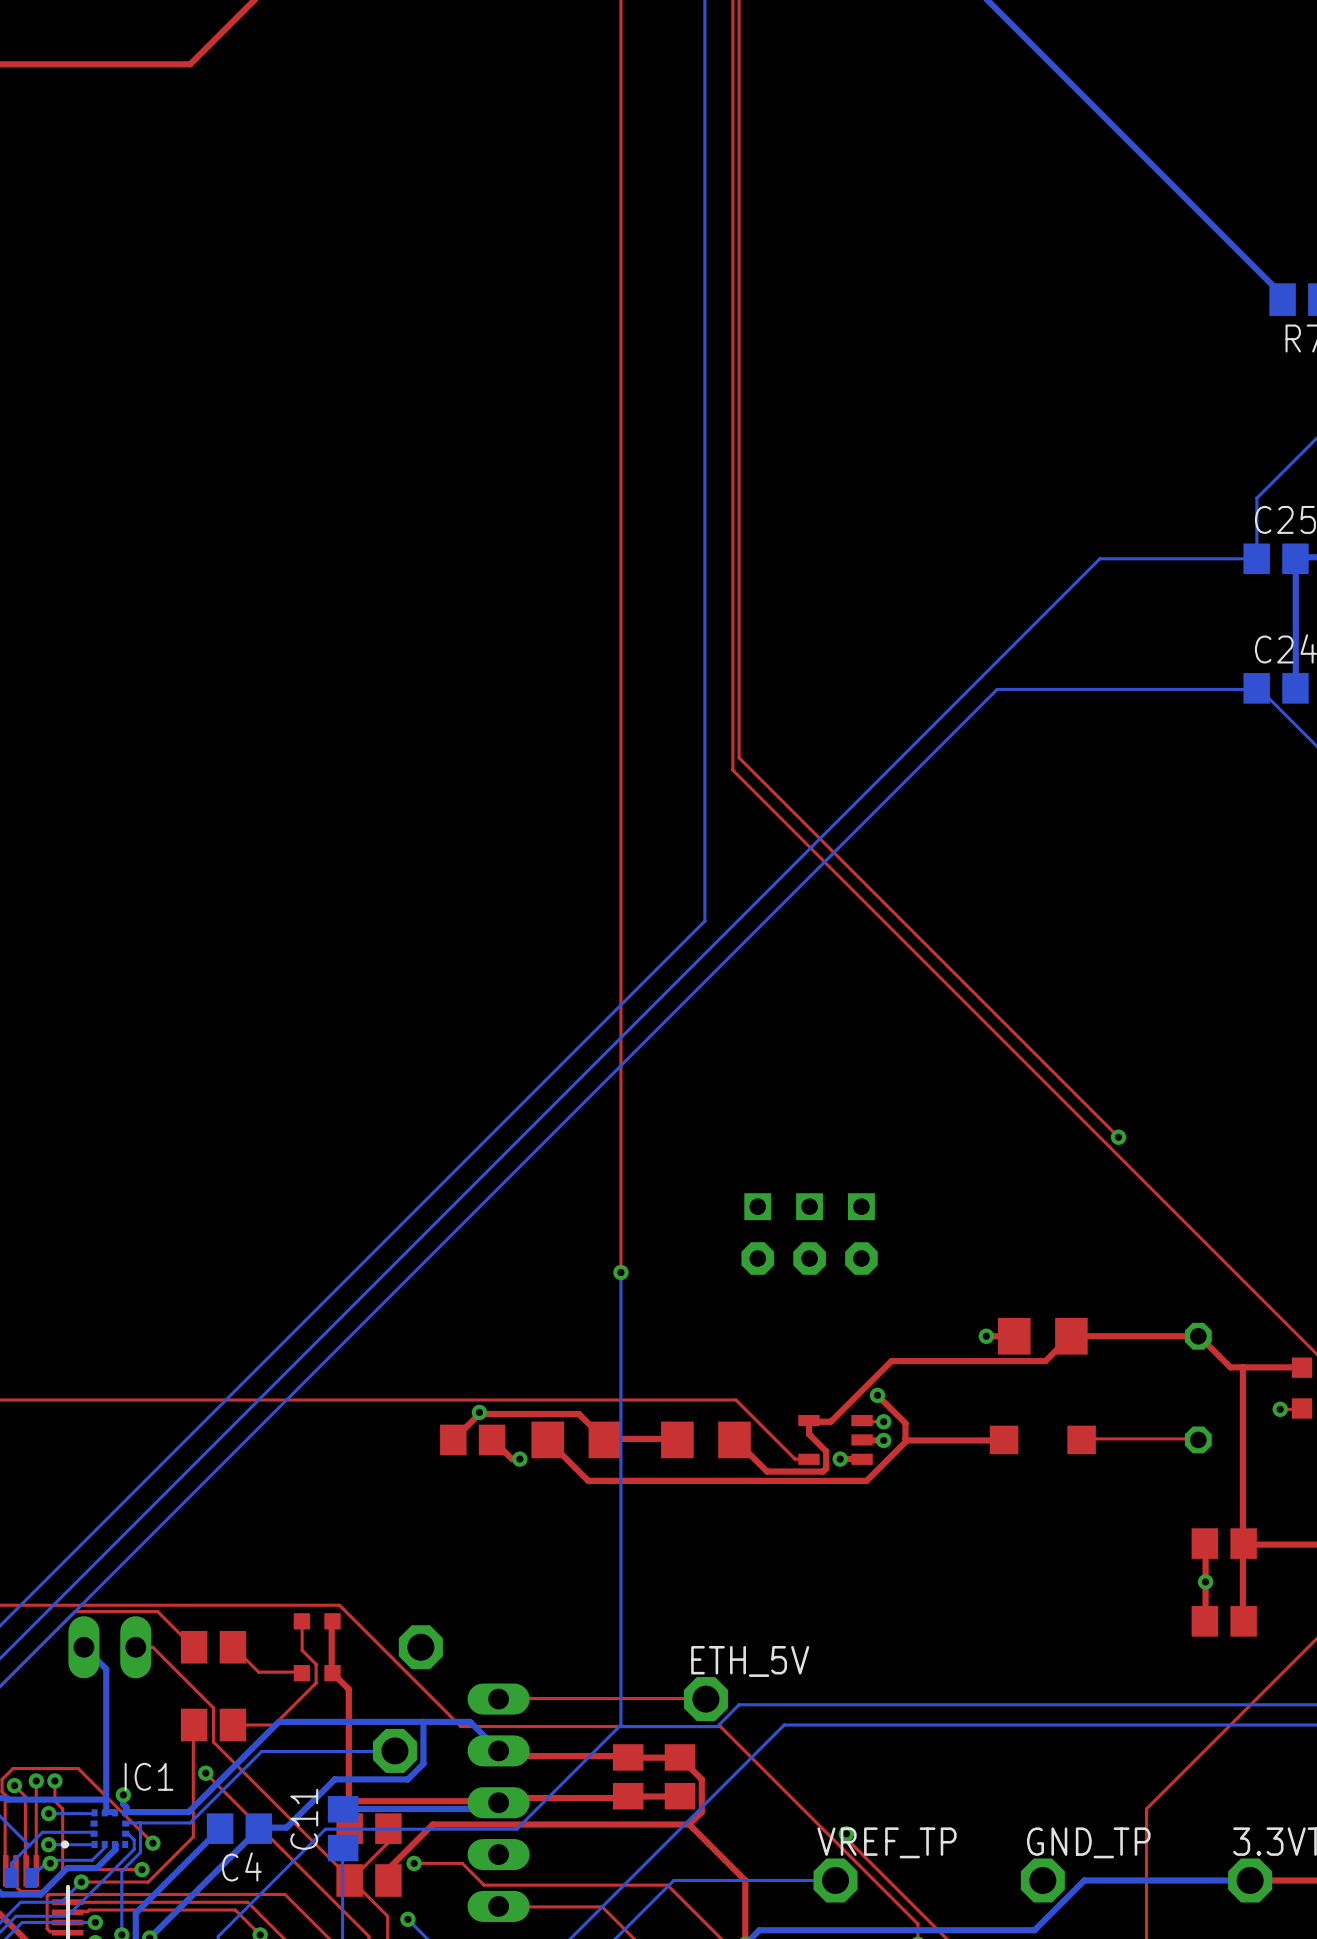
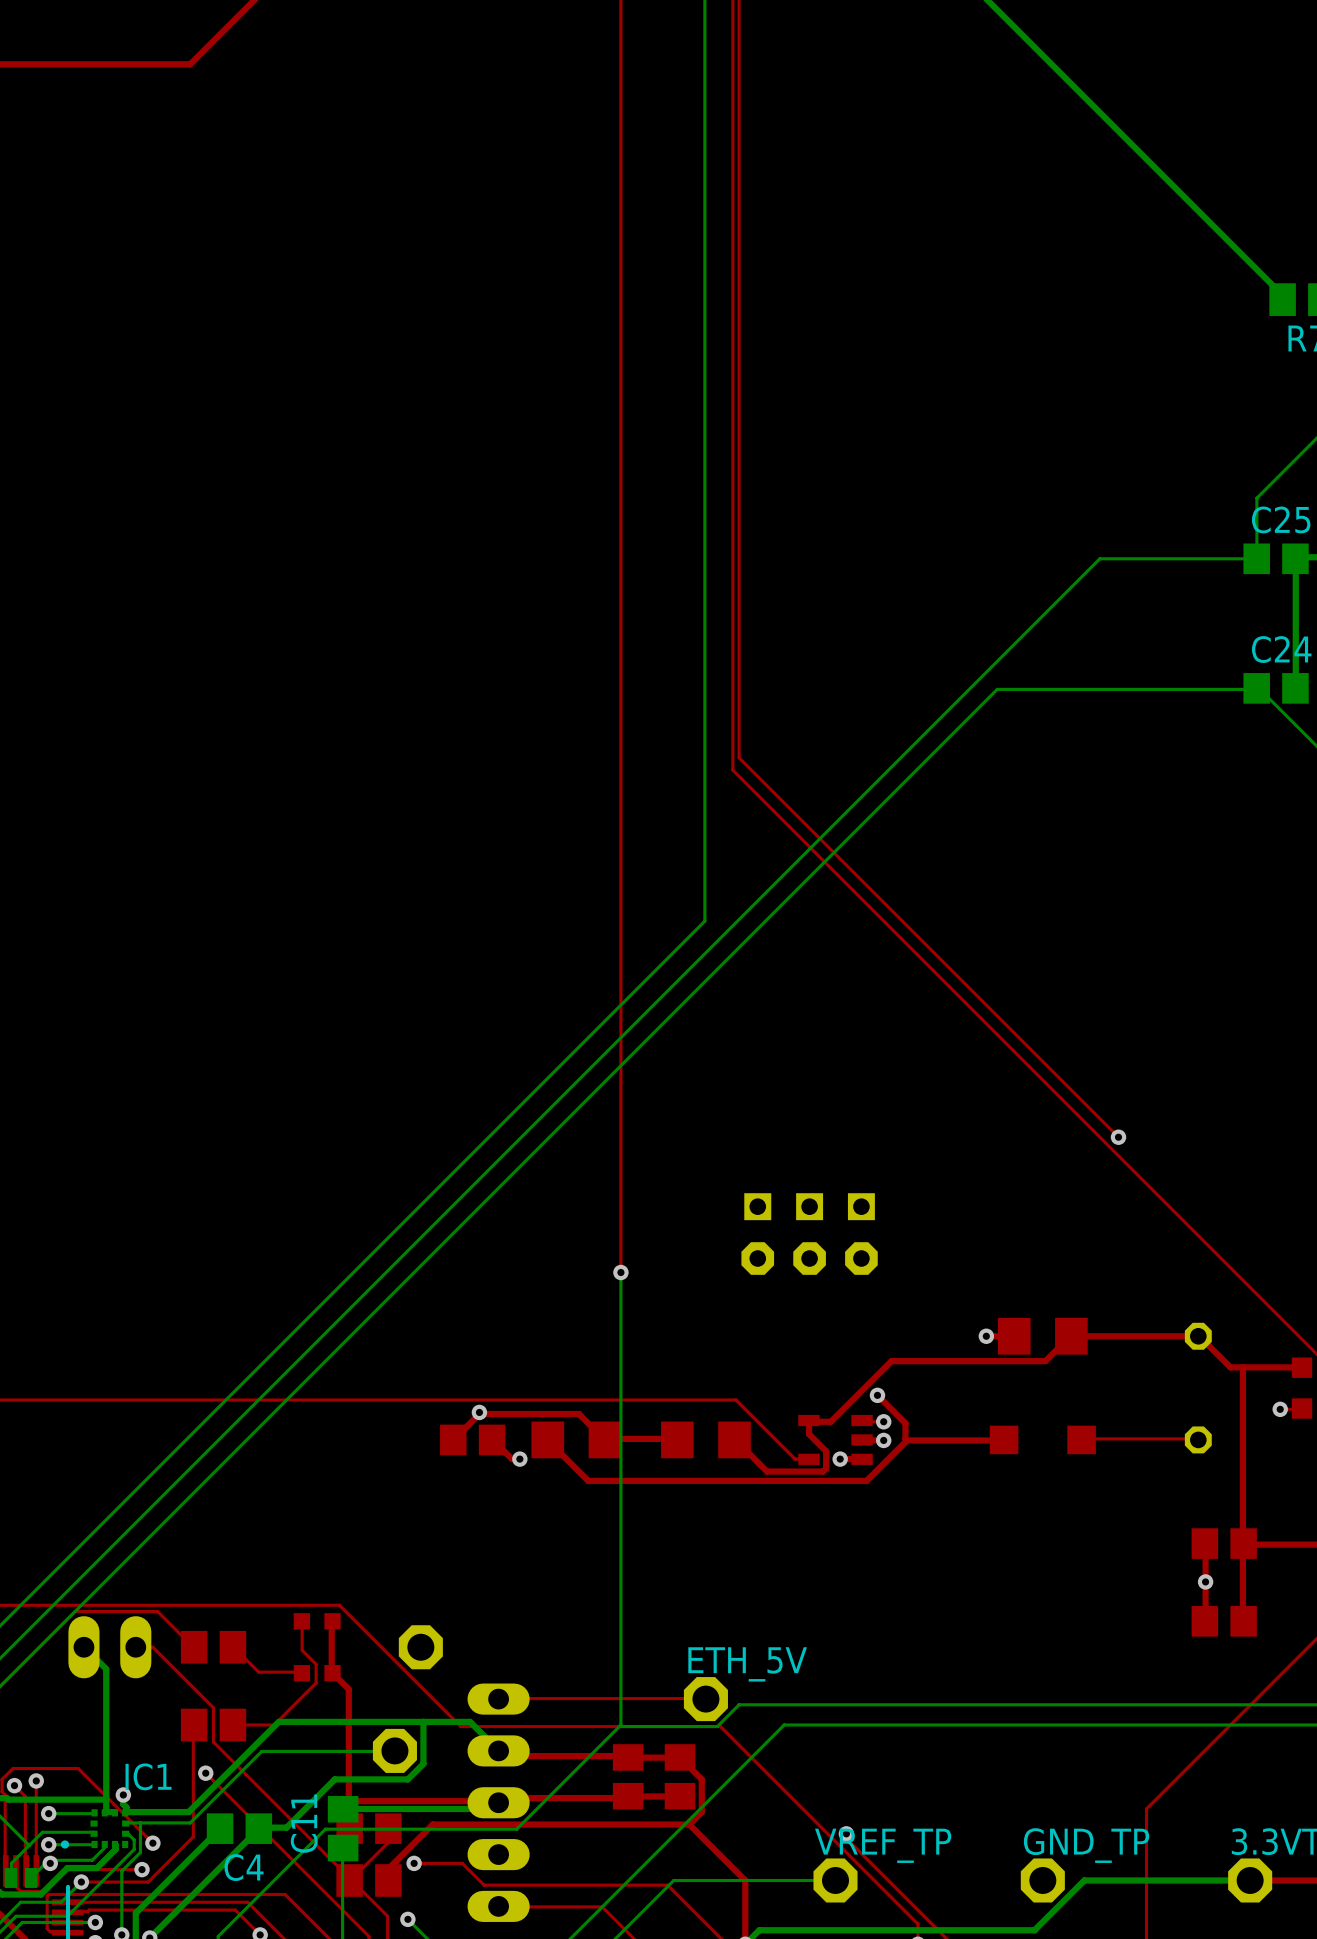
top track: (54, 1780) (54, 1801) (62, 1808) (63, 1870) -> none
via: (54, 1780) -> none

